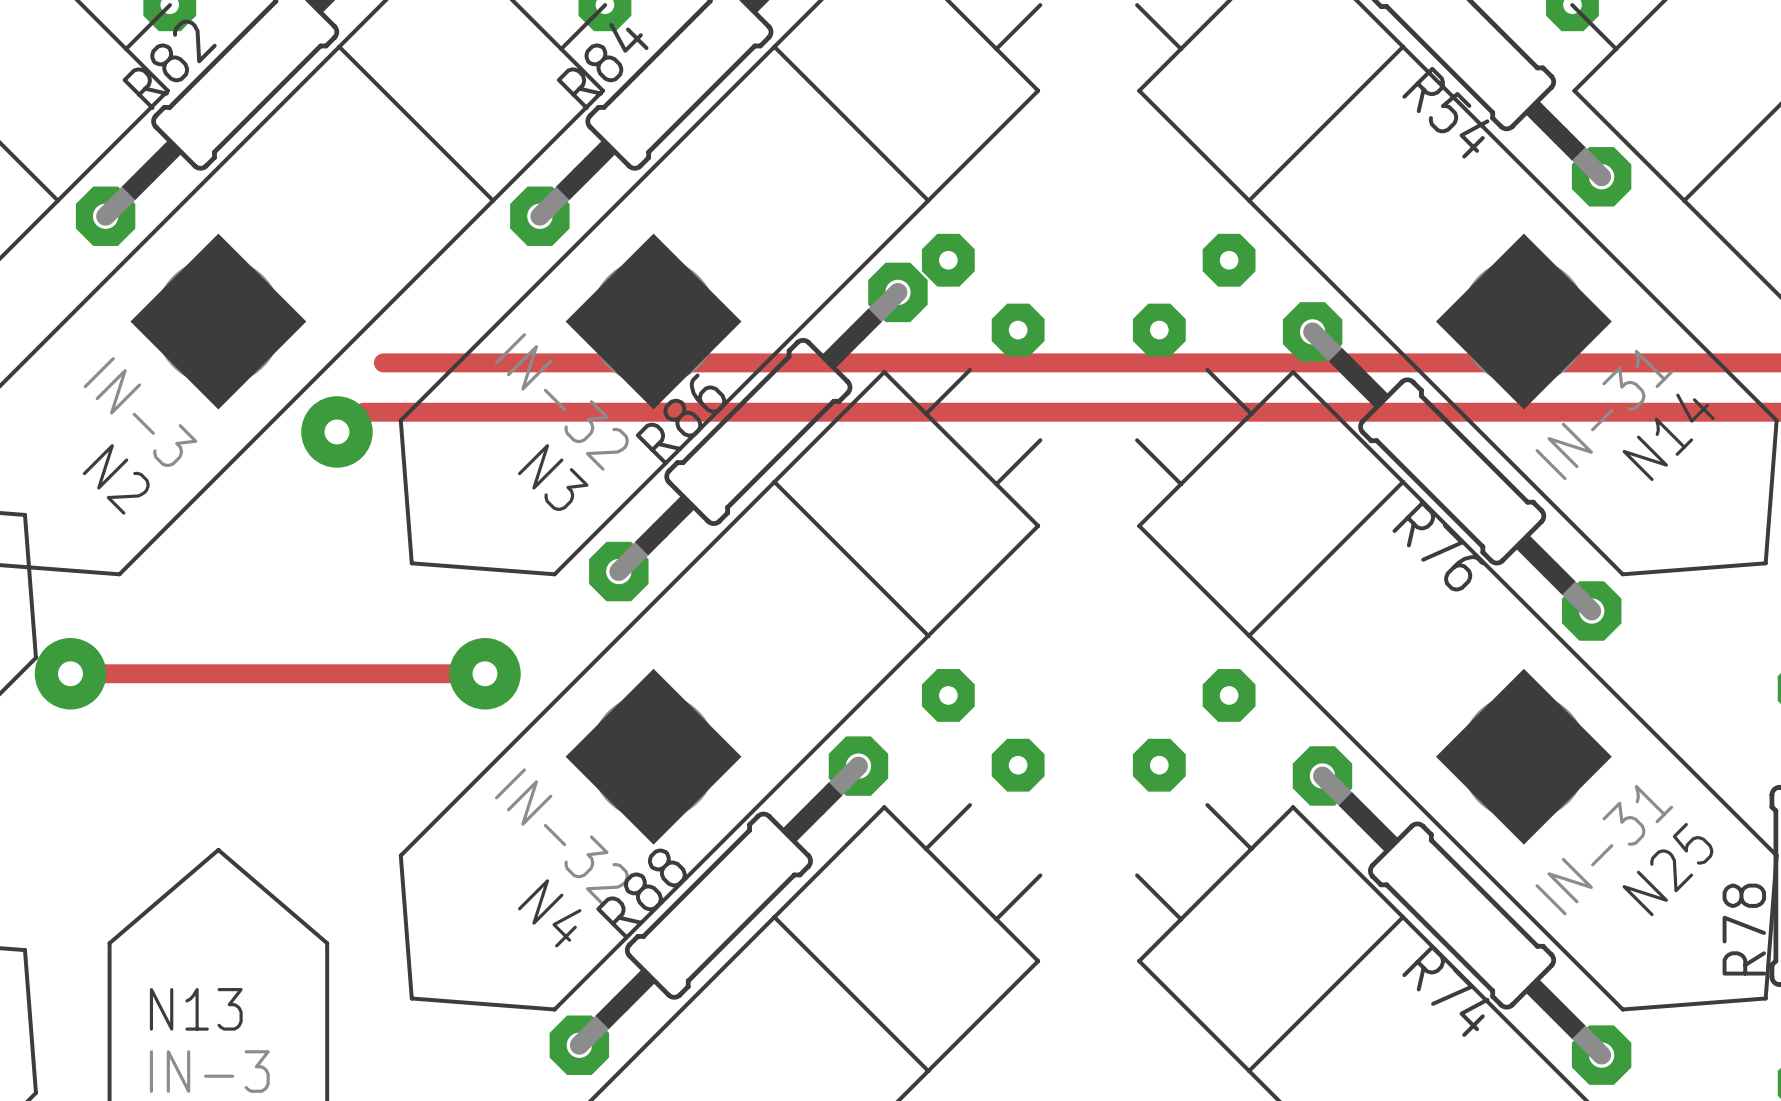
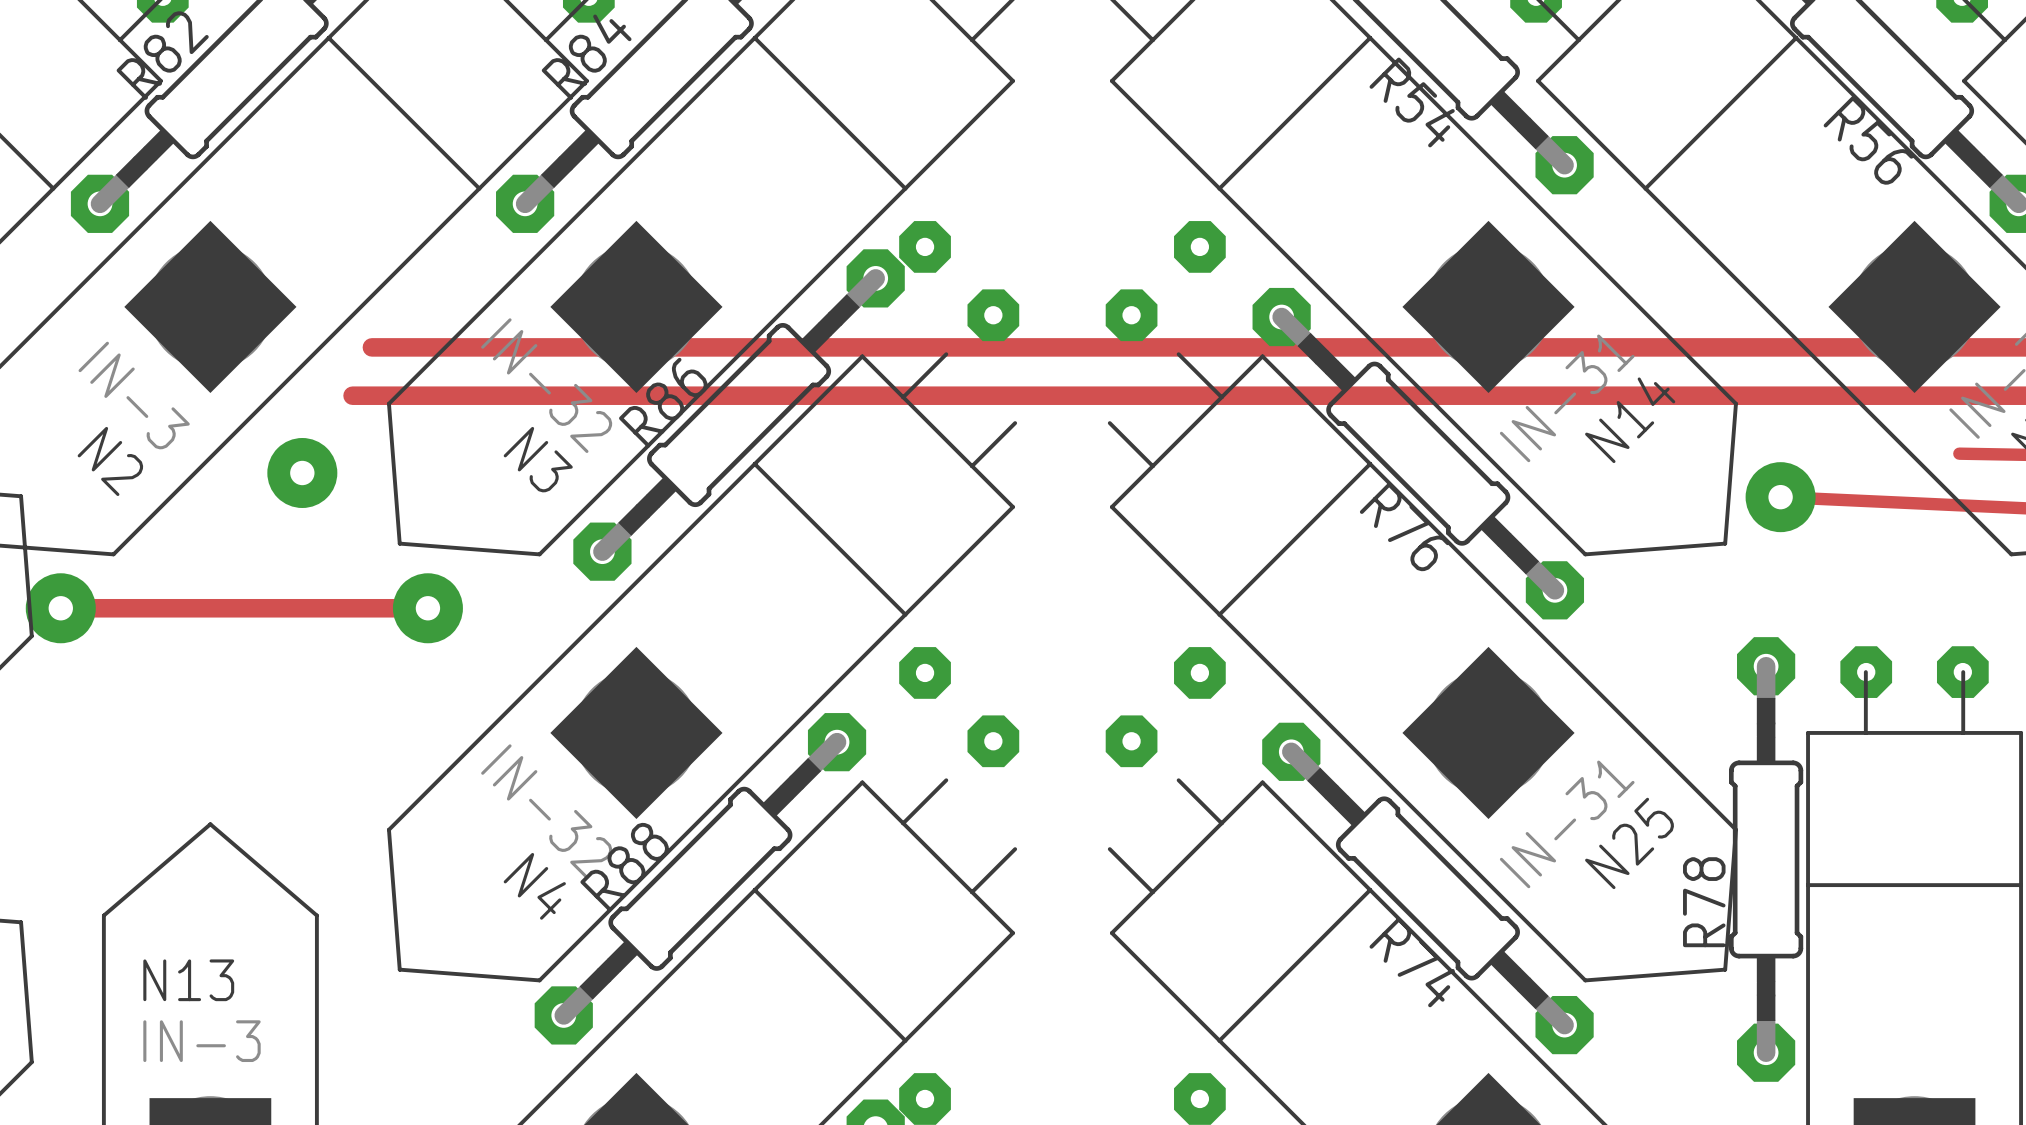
via position: (336, 431) -> (302, 473)
track: none -> (60, 608) (427, 608)
track: (70, 673) (484, 673) -> none
via position: (70, 673) -> (60, 608)
via position: (484, 673) -> (427, 608)

